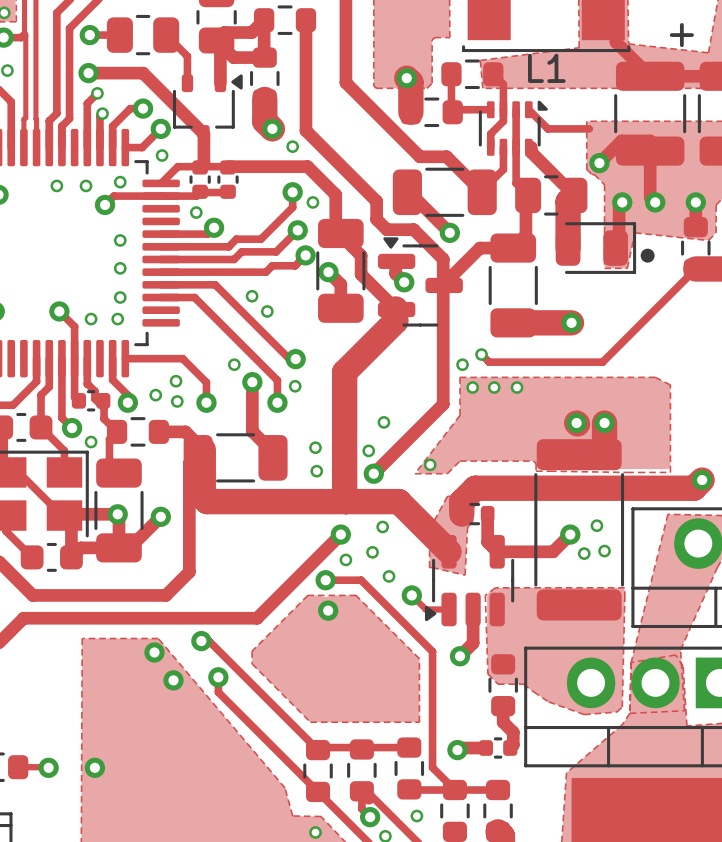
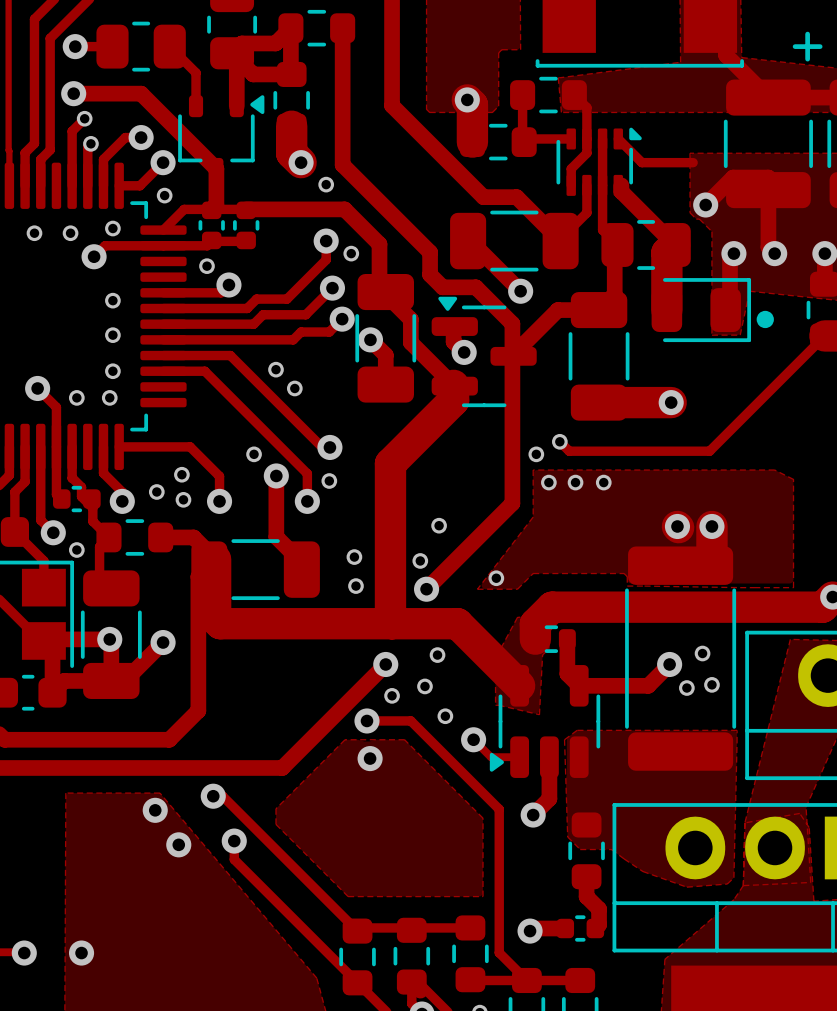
L1 name: L1 (546, 68) -> none

